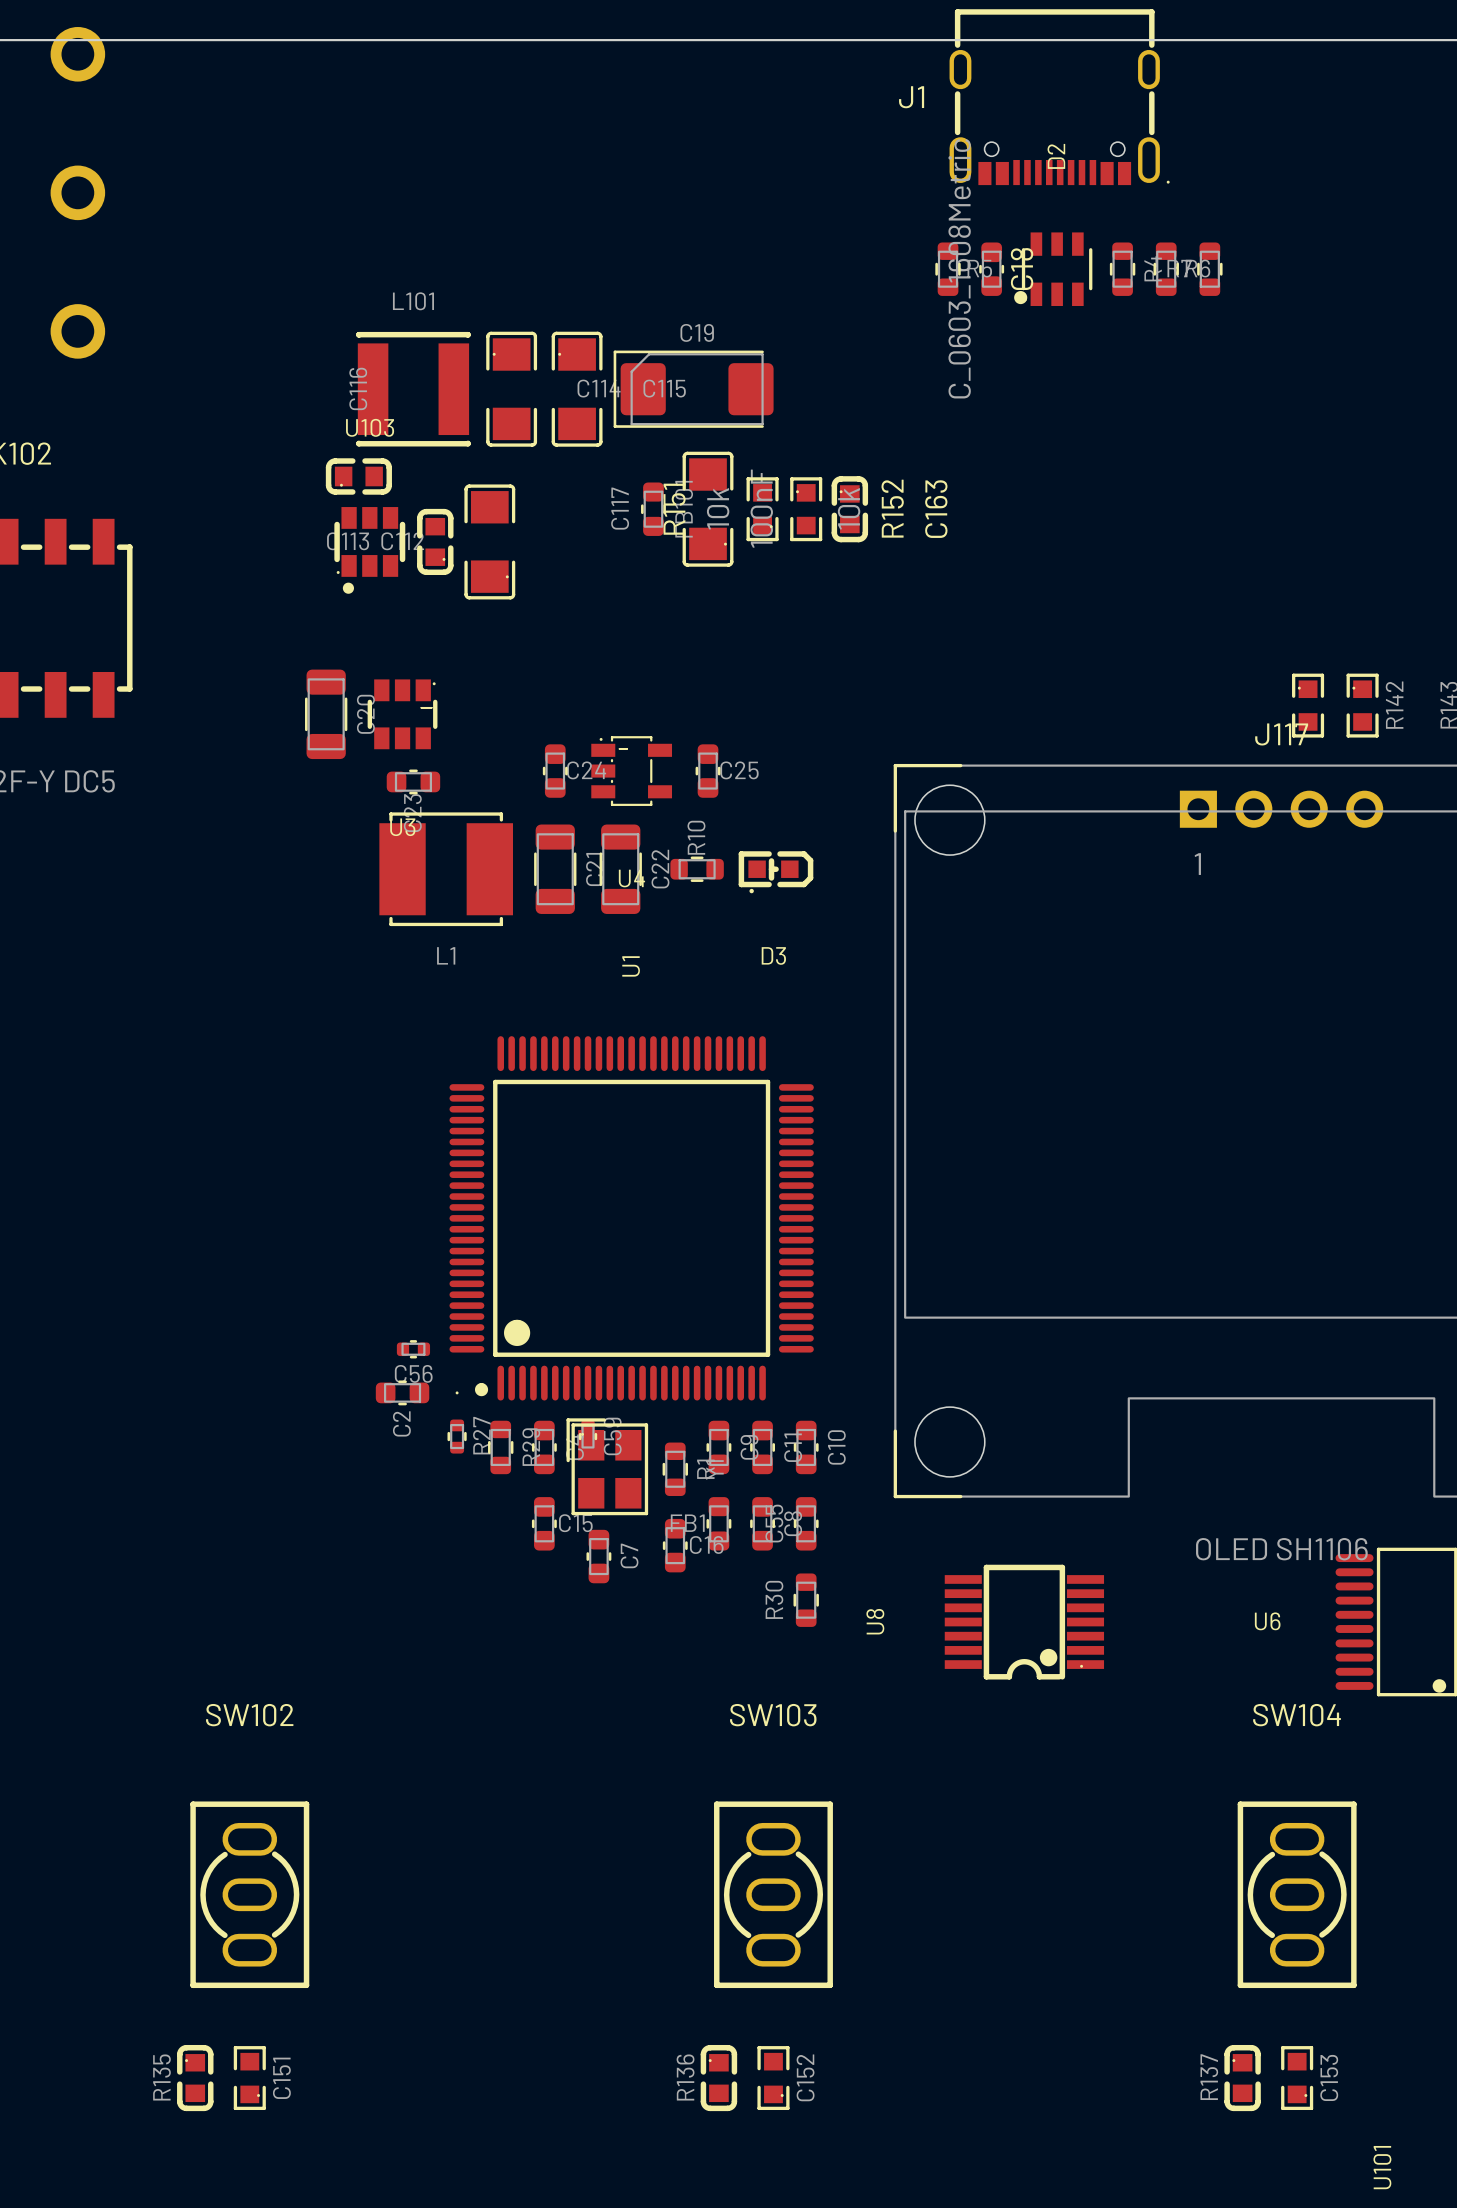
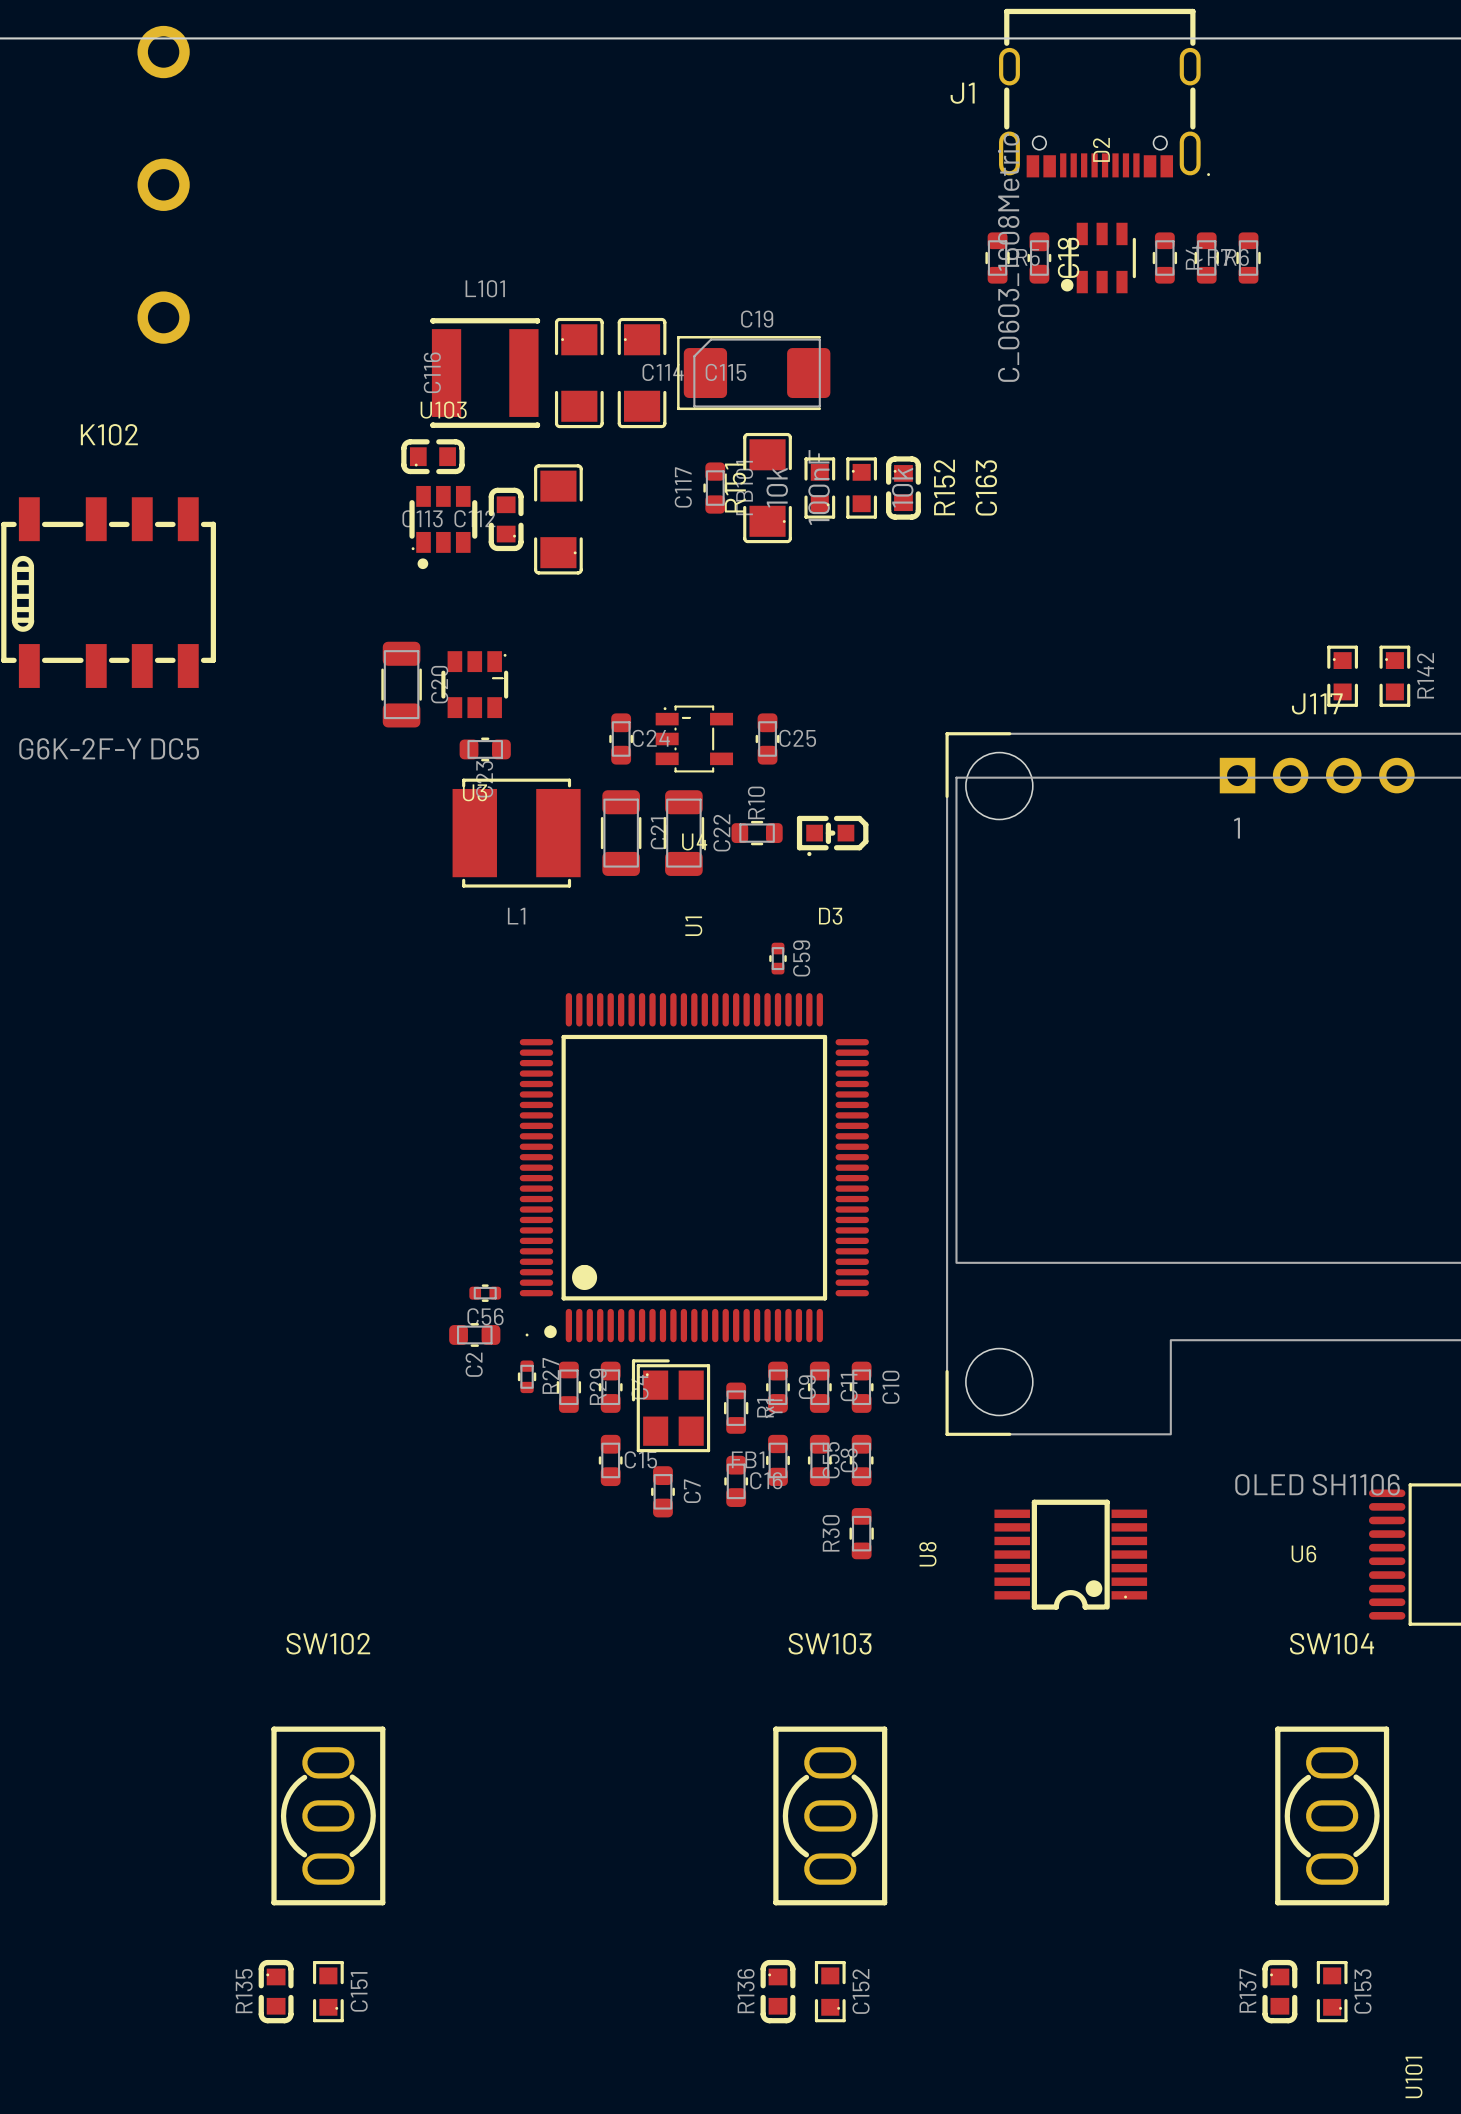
C59 position: (588, 1436) -> (777, 958)

